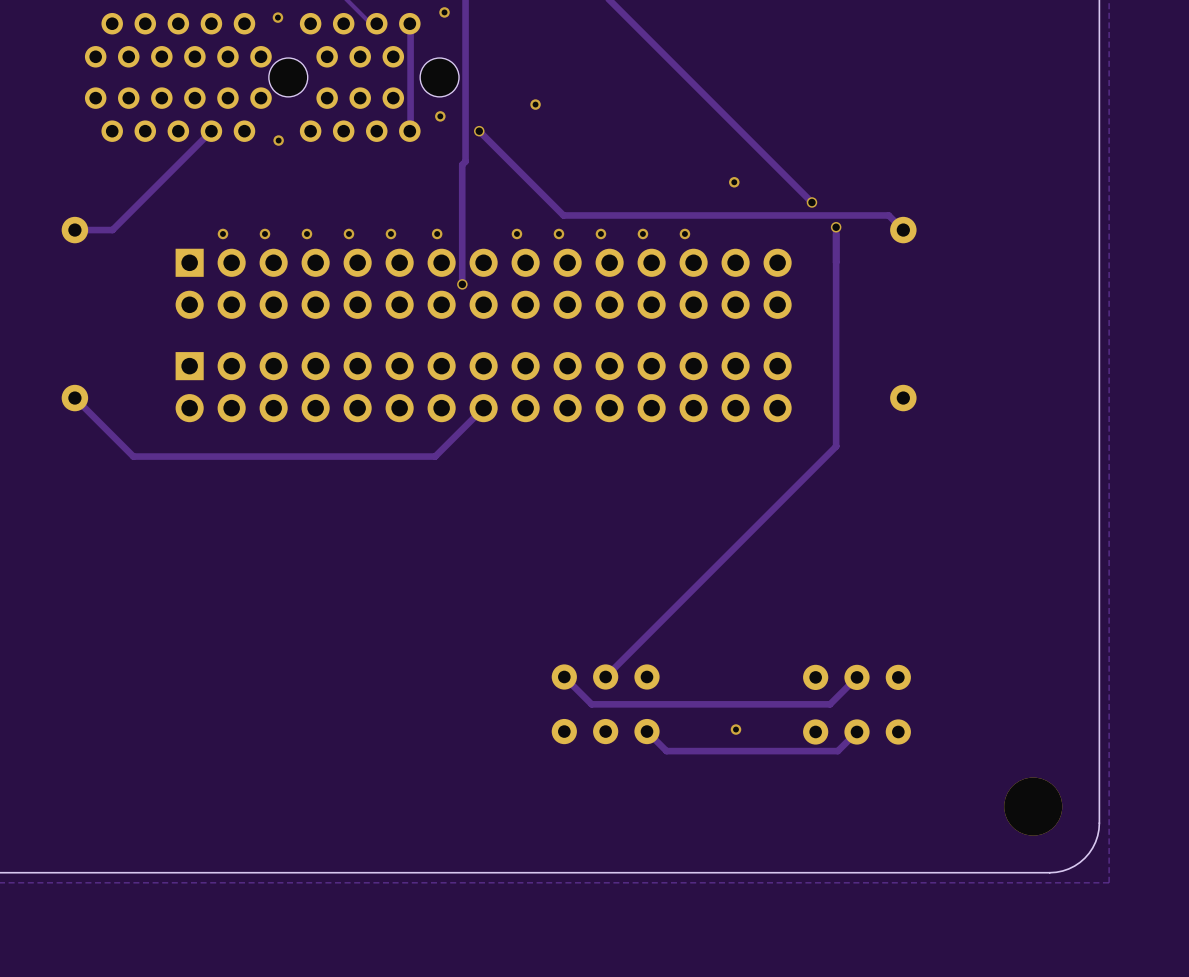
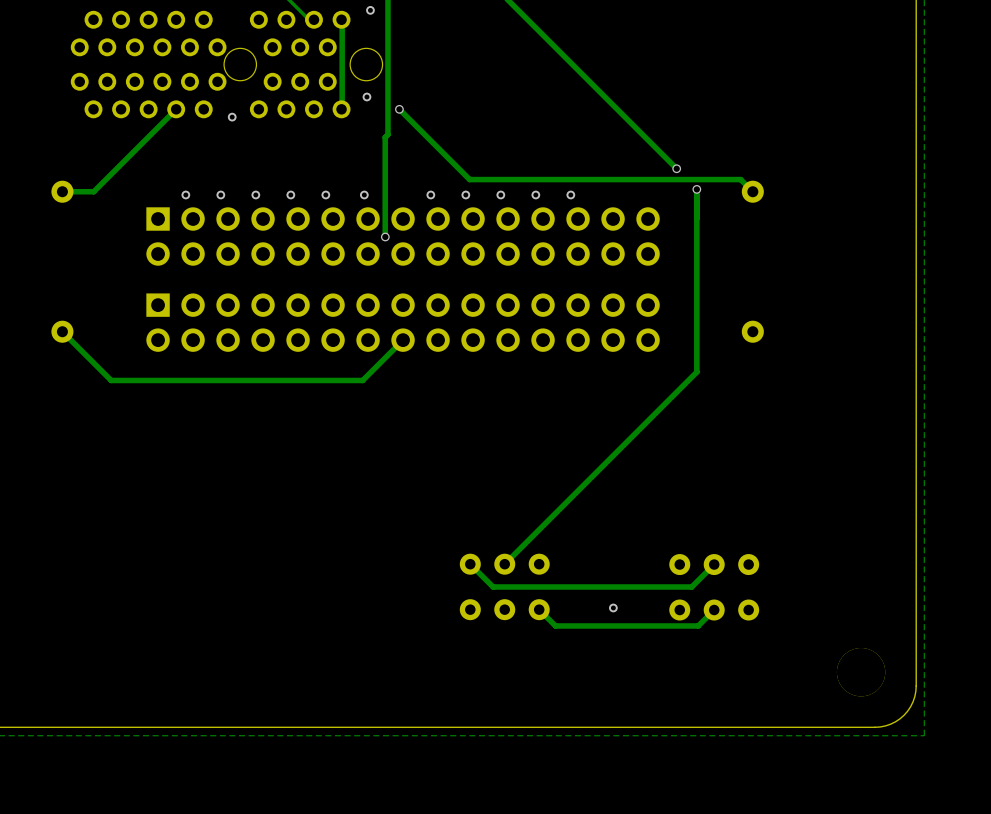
via: (277, 17) -> none
via: (535, 104) -> none
via: (734, 182) -> none

